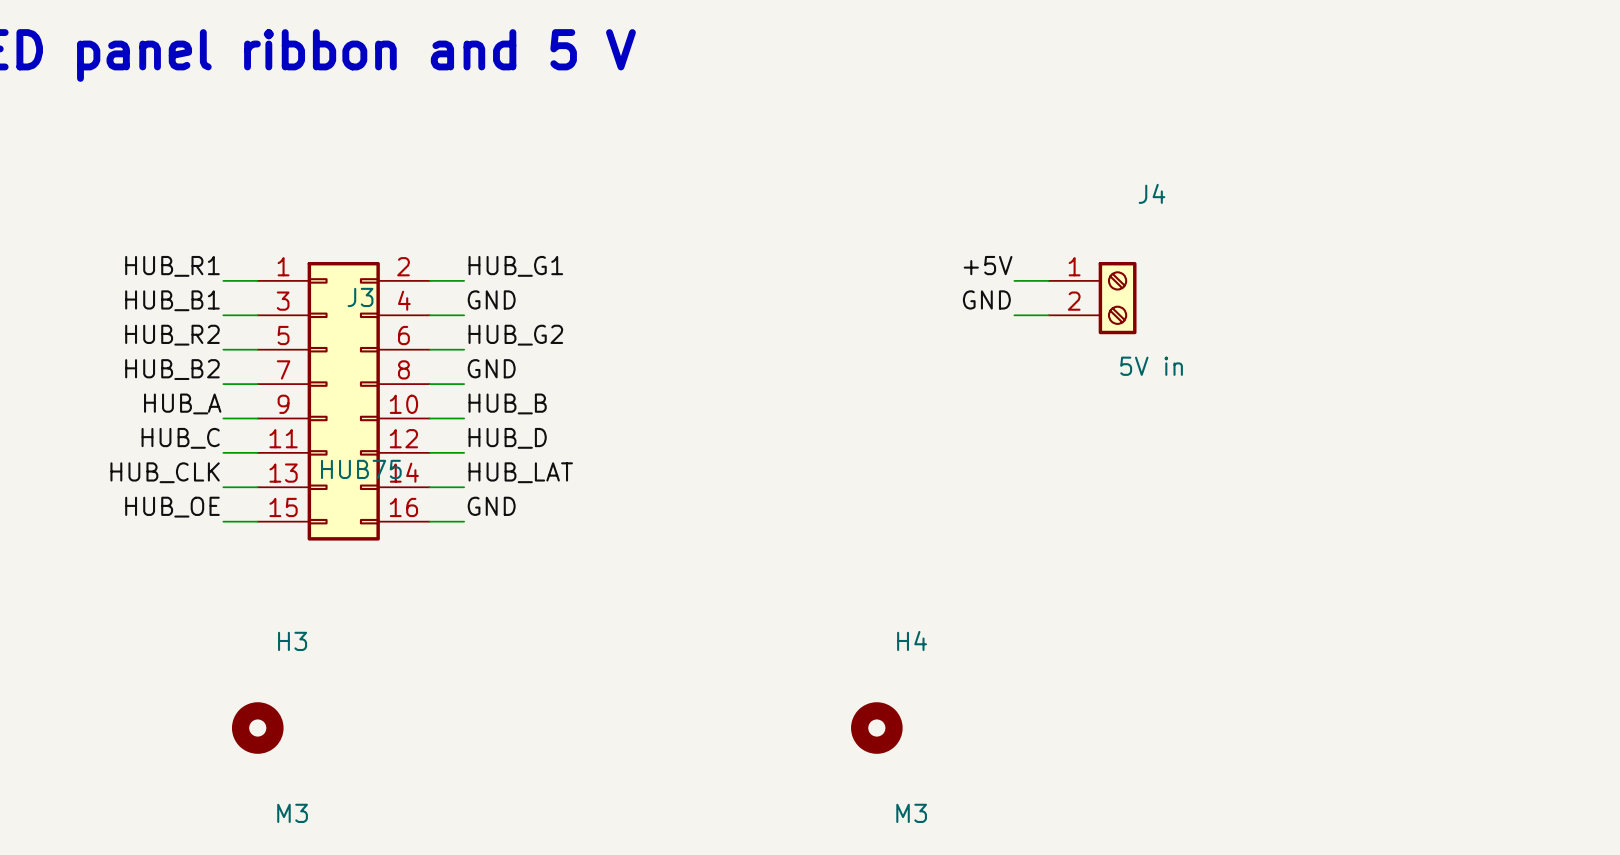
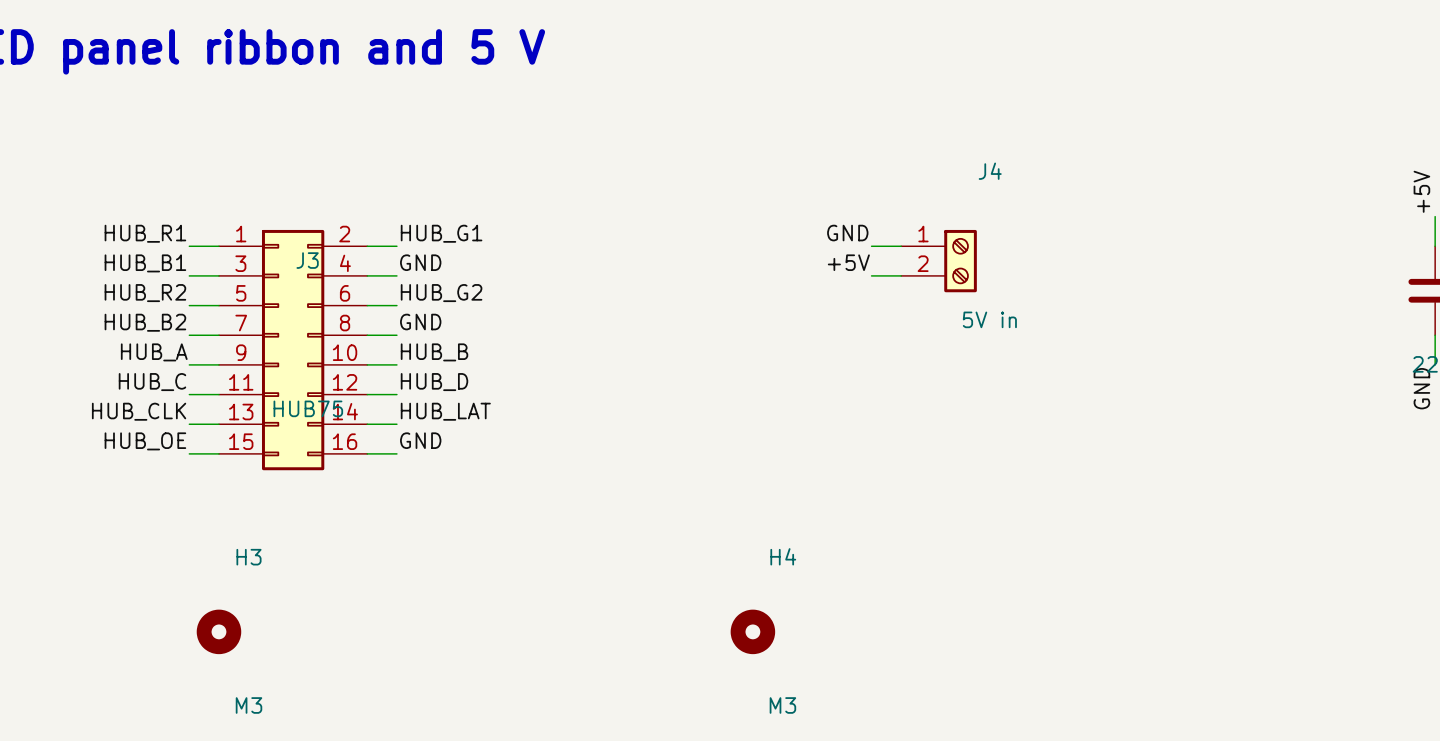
label: +5V (988, 265) -> GND (847, 233)
label: GND (986, 299) -> +5V (848, 262)

